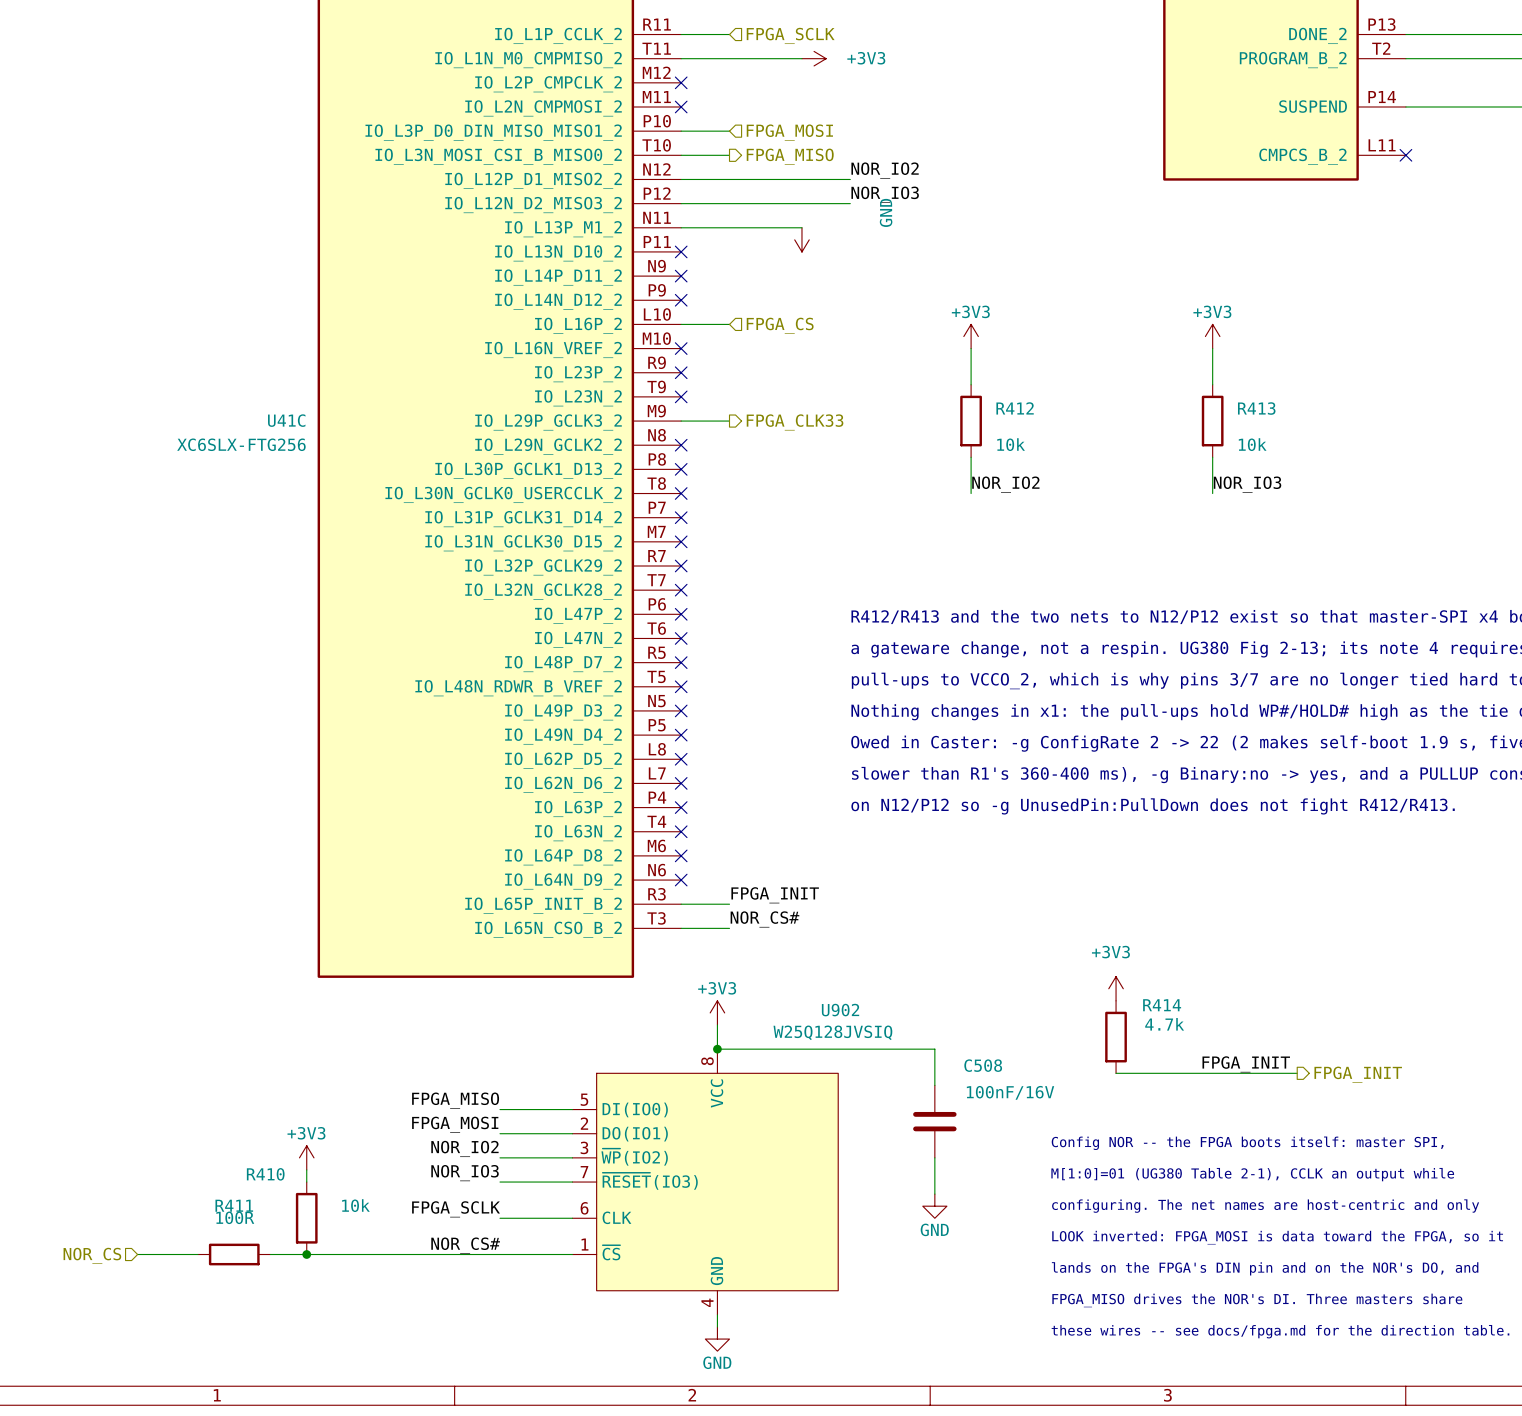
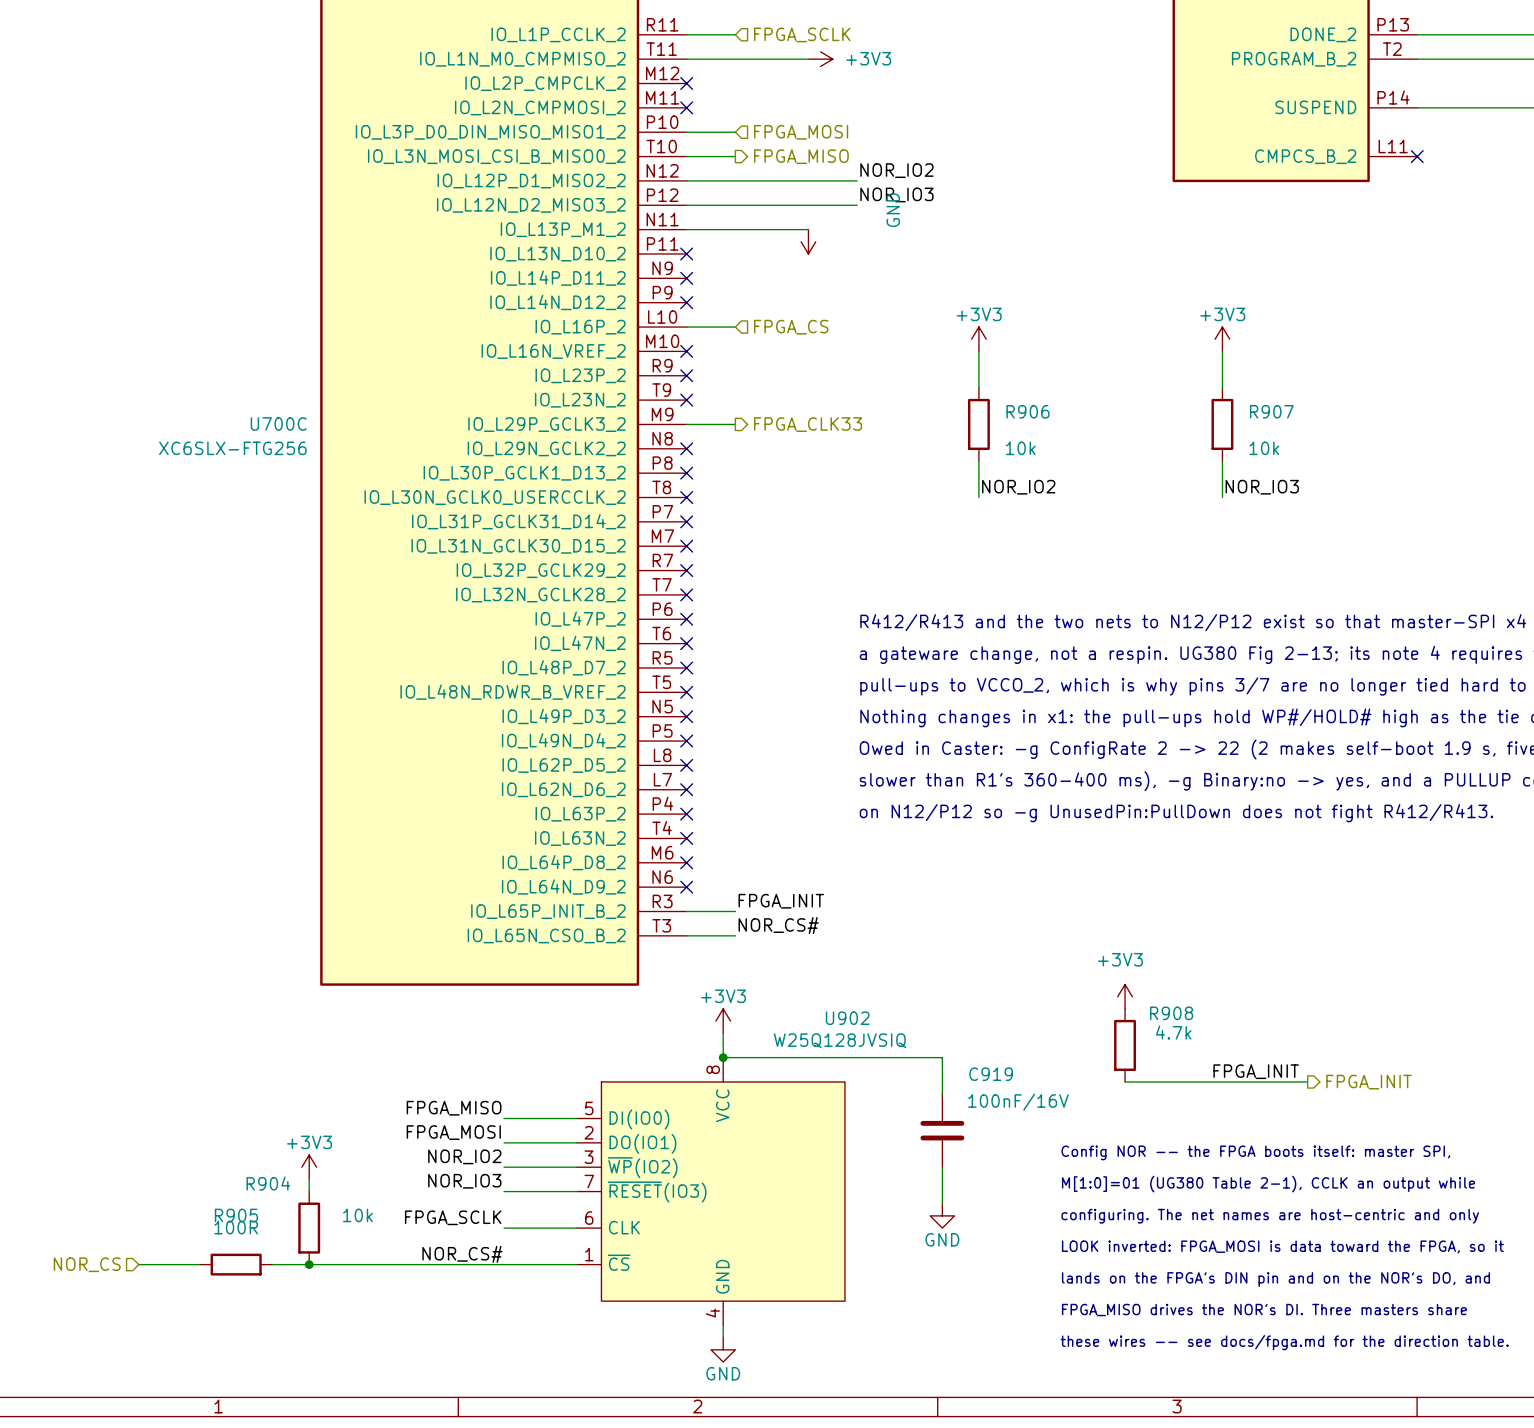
R412 name: R412 (1015, 408) -> R906 (1028, 411)
R413 name: R413 (1256, 408) -> R907 (1271, 411)
U41C name: U41C (286, 420) -> U700C (278, 423)
R414 name: R414 (1162, 1005) -> R908 (1171, 1013)
C508 name: C508 (983, 1065) -> C919 (991, 1074)
R410 name: R410 (265, 1174) -> R904 (268, 1183)
R411 name: R411 (234, 1205) -> R905 (236, 1215)

